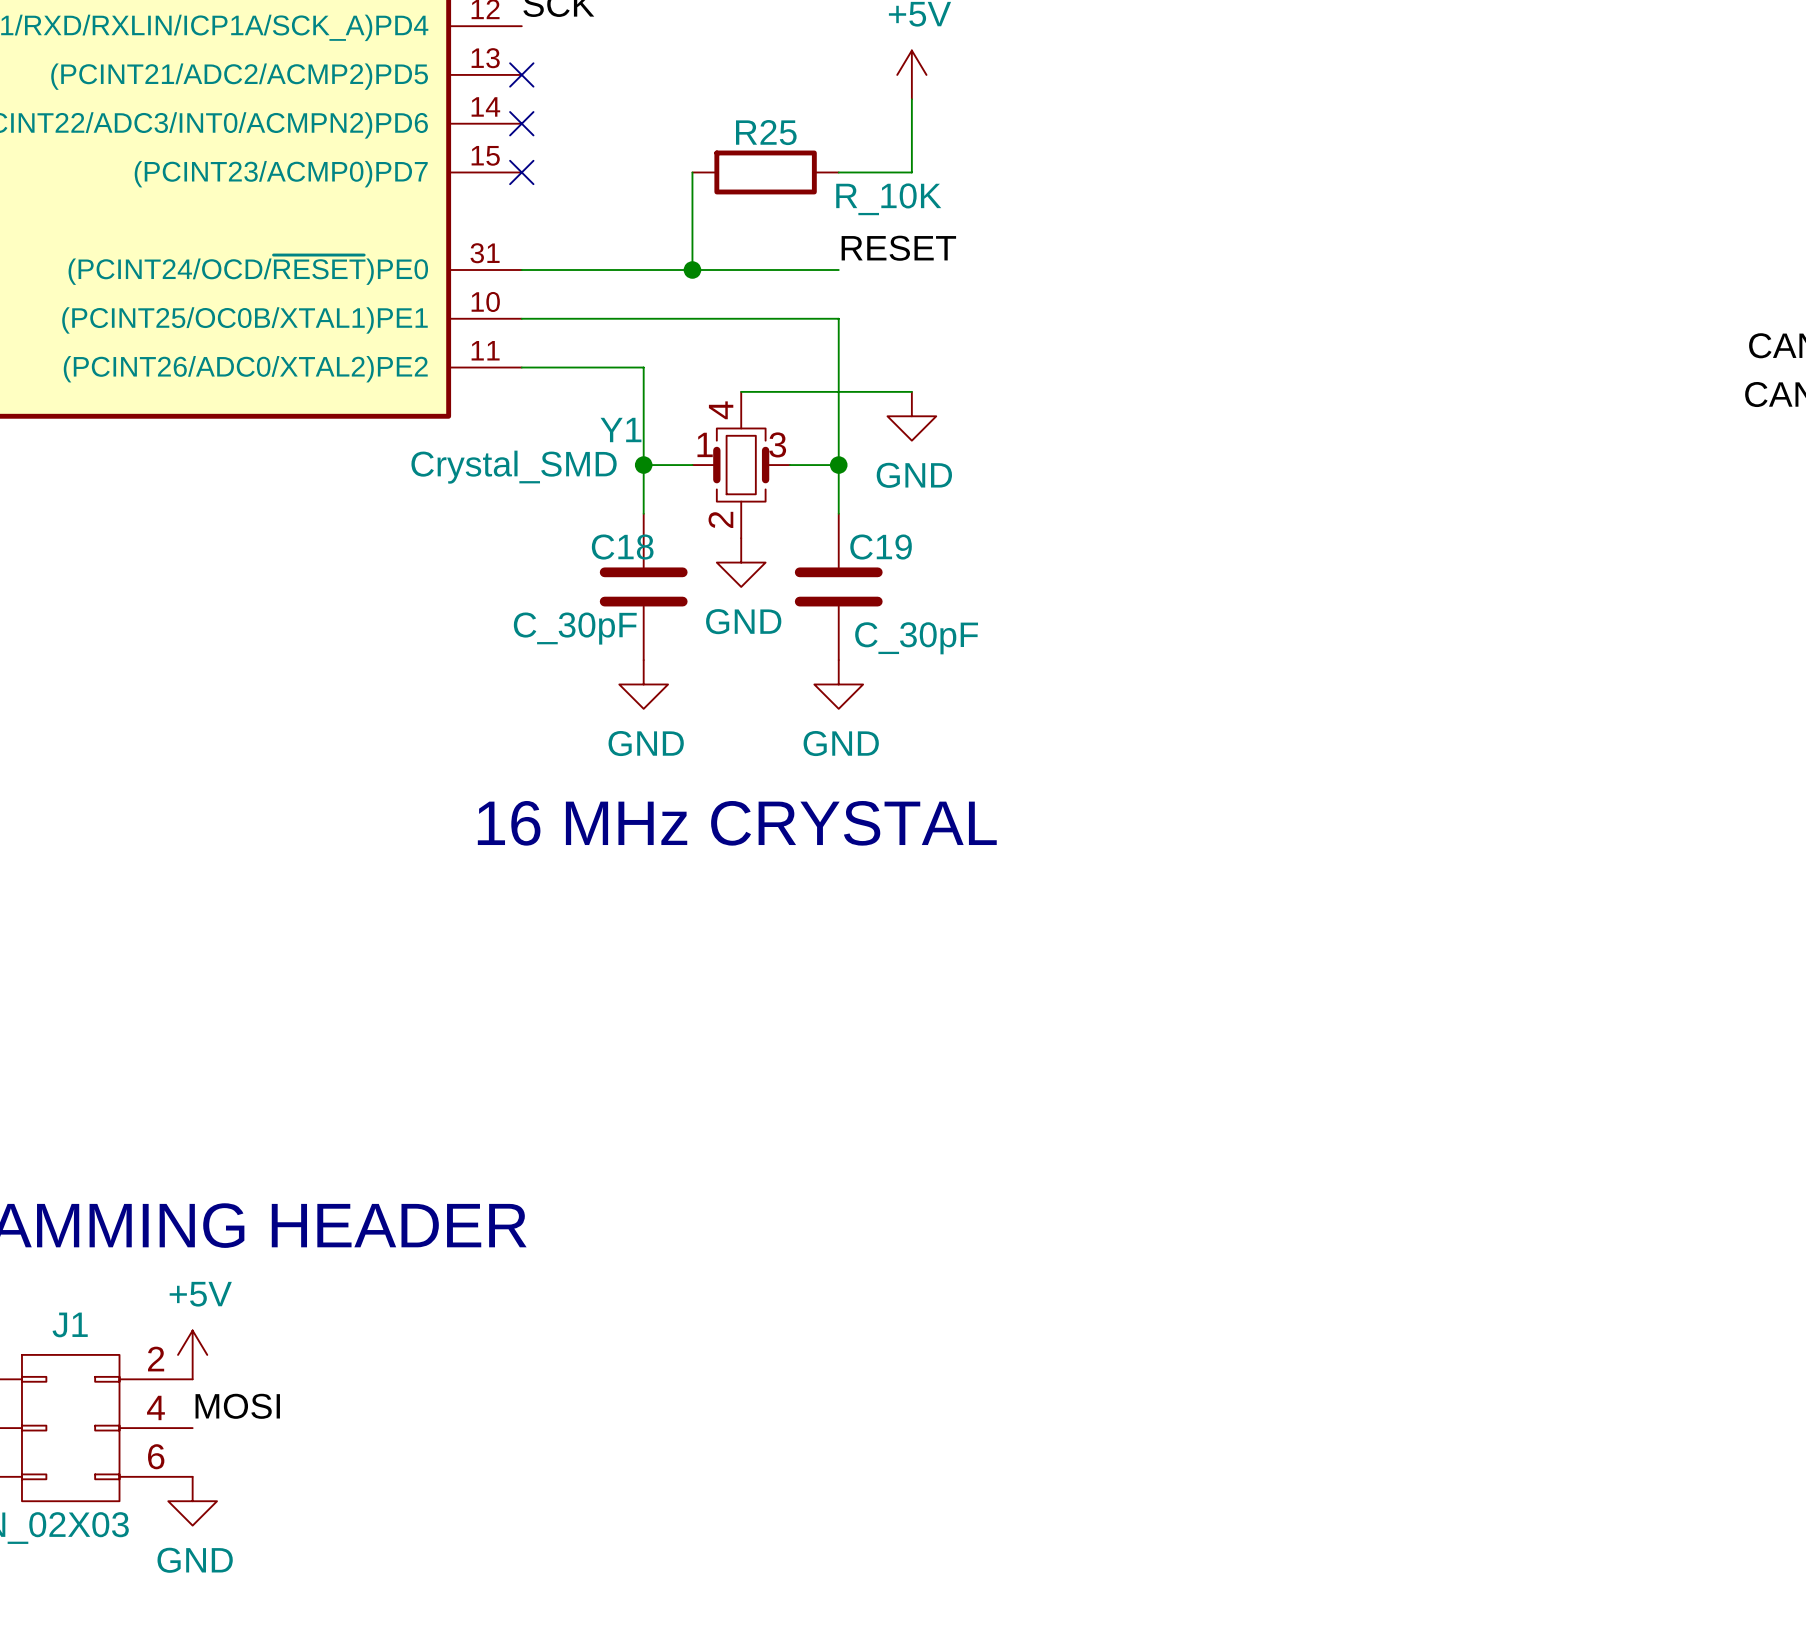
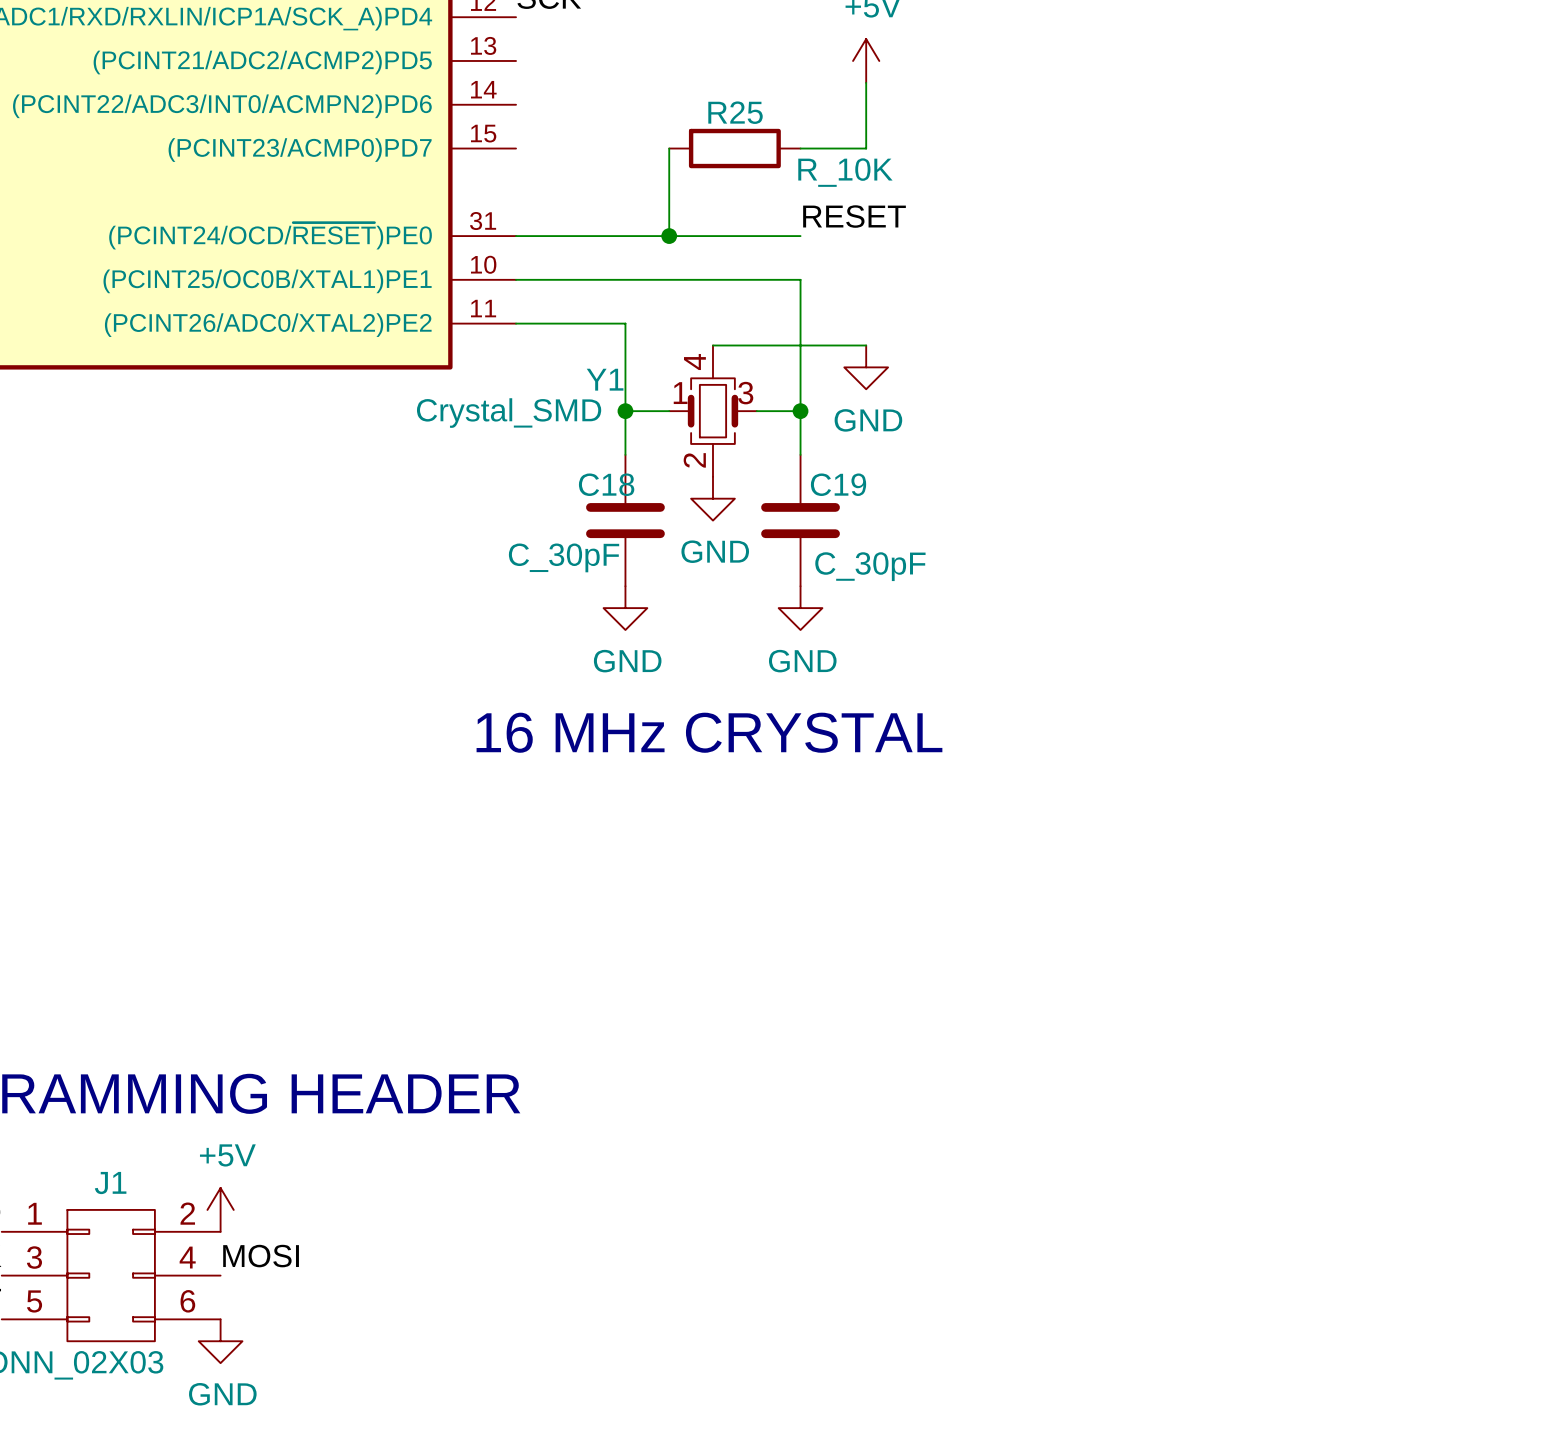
no-connect mark: (521, 74) -> none
no-connect mark: (521, 123) -> none
no-connect mark: (521, 172) -> none

